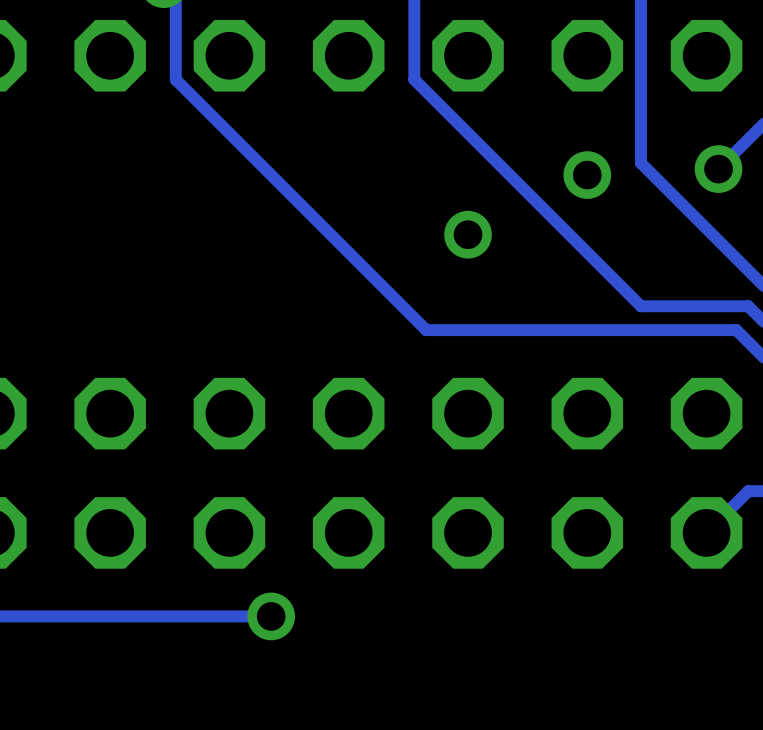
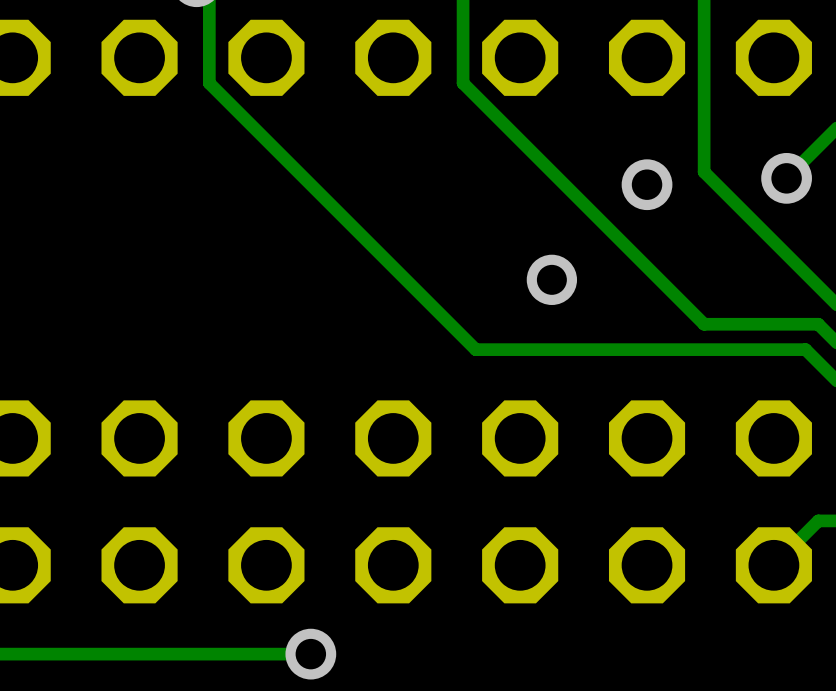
via position: (468, 234) -> (551, 279)

